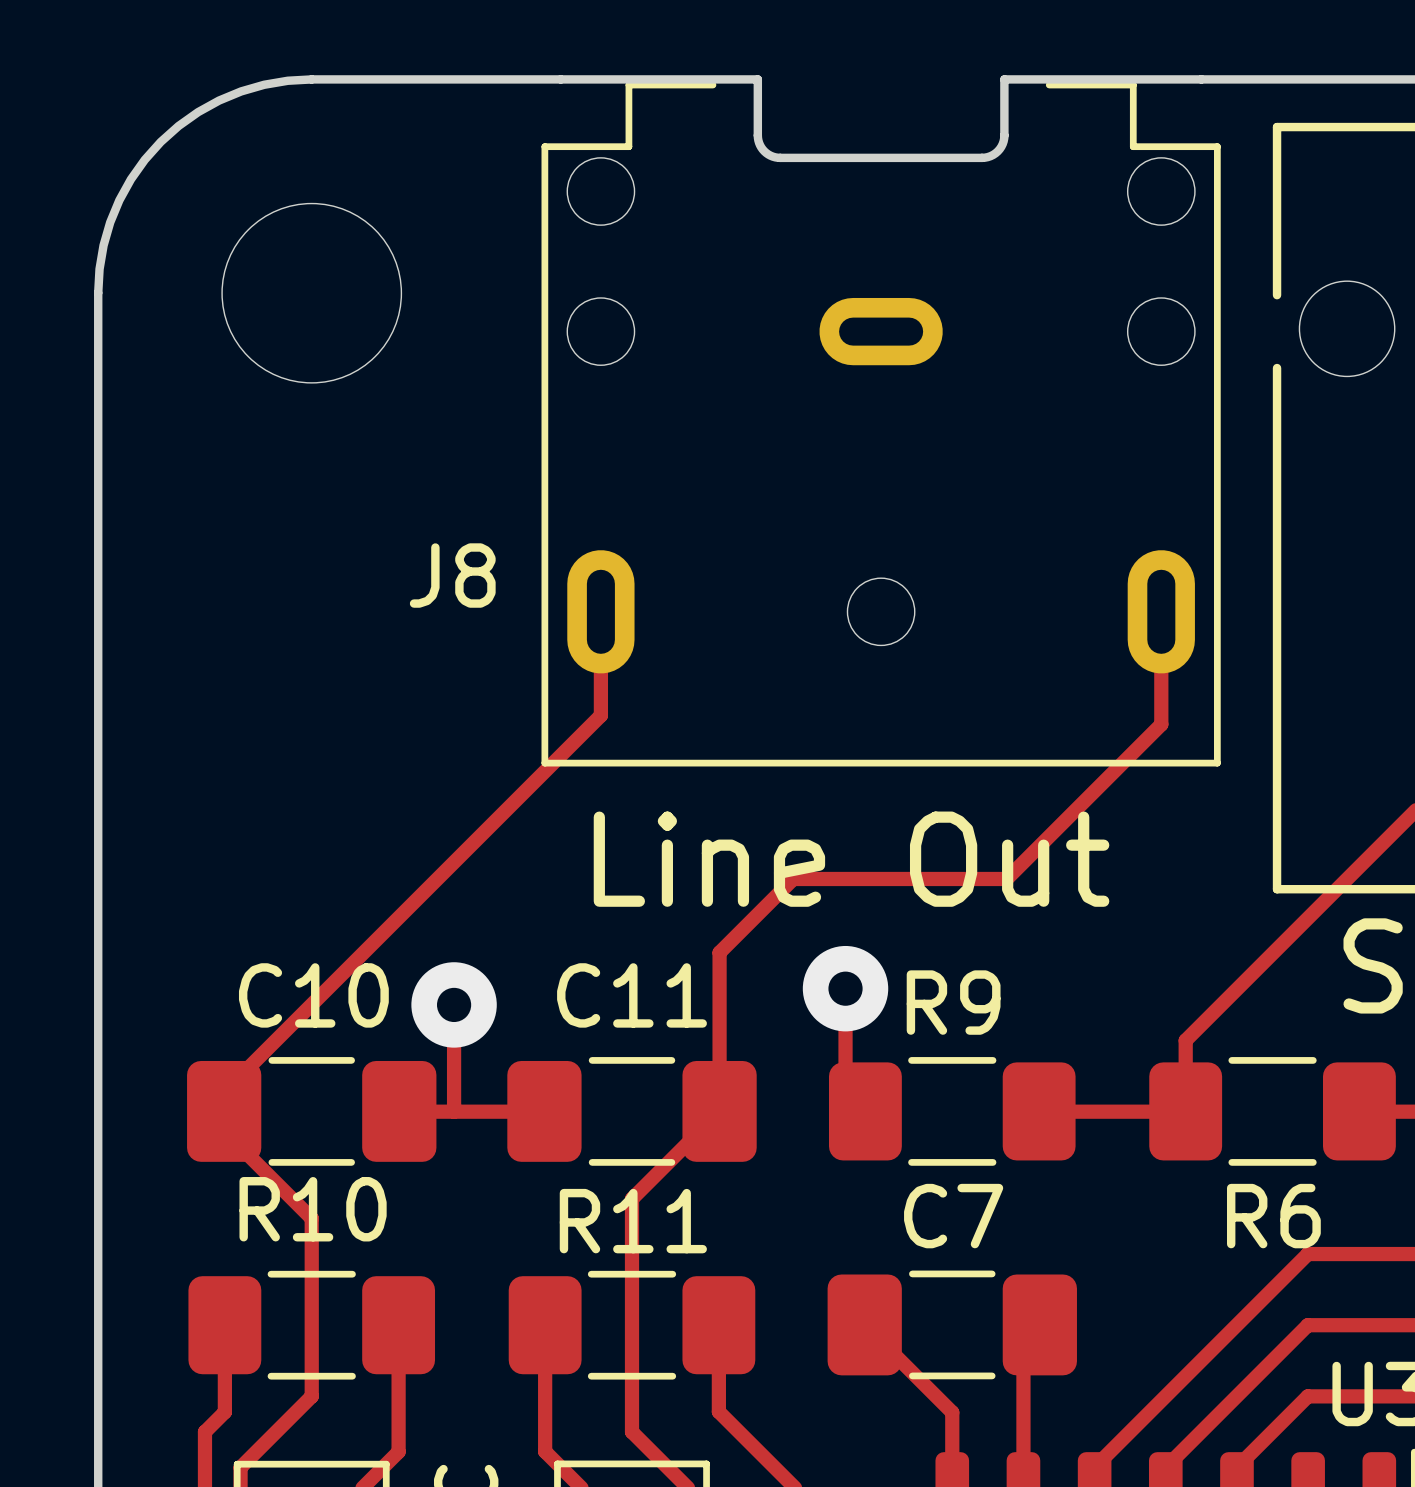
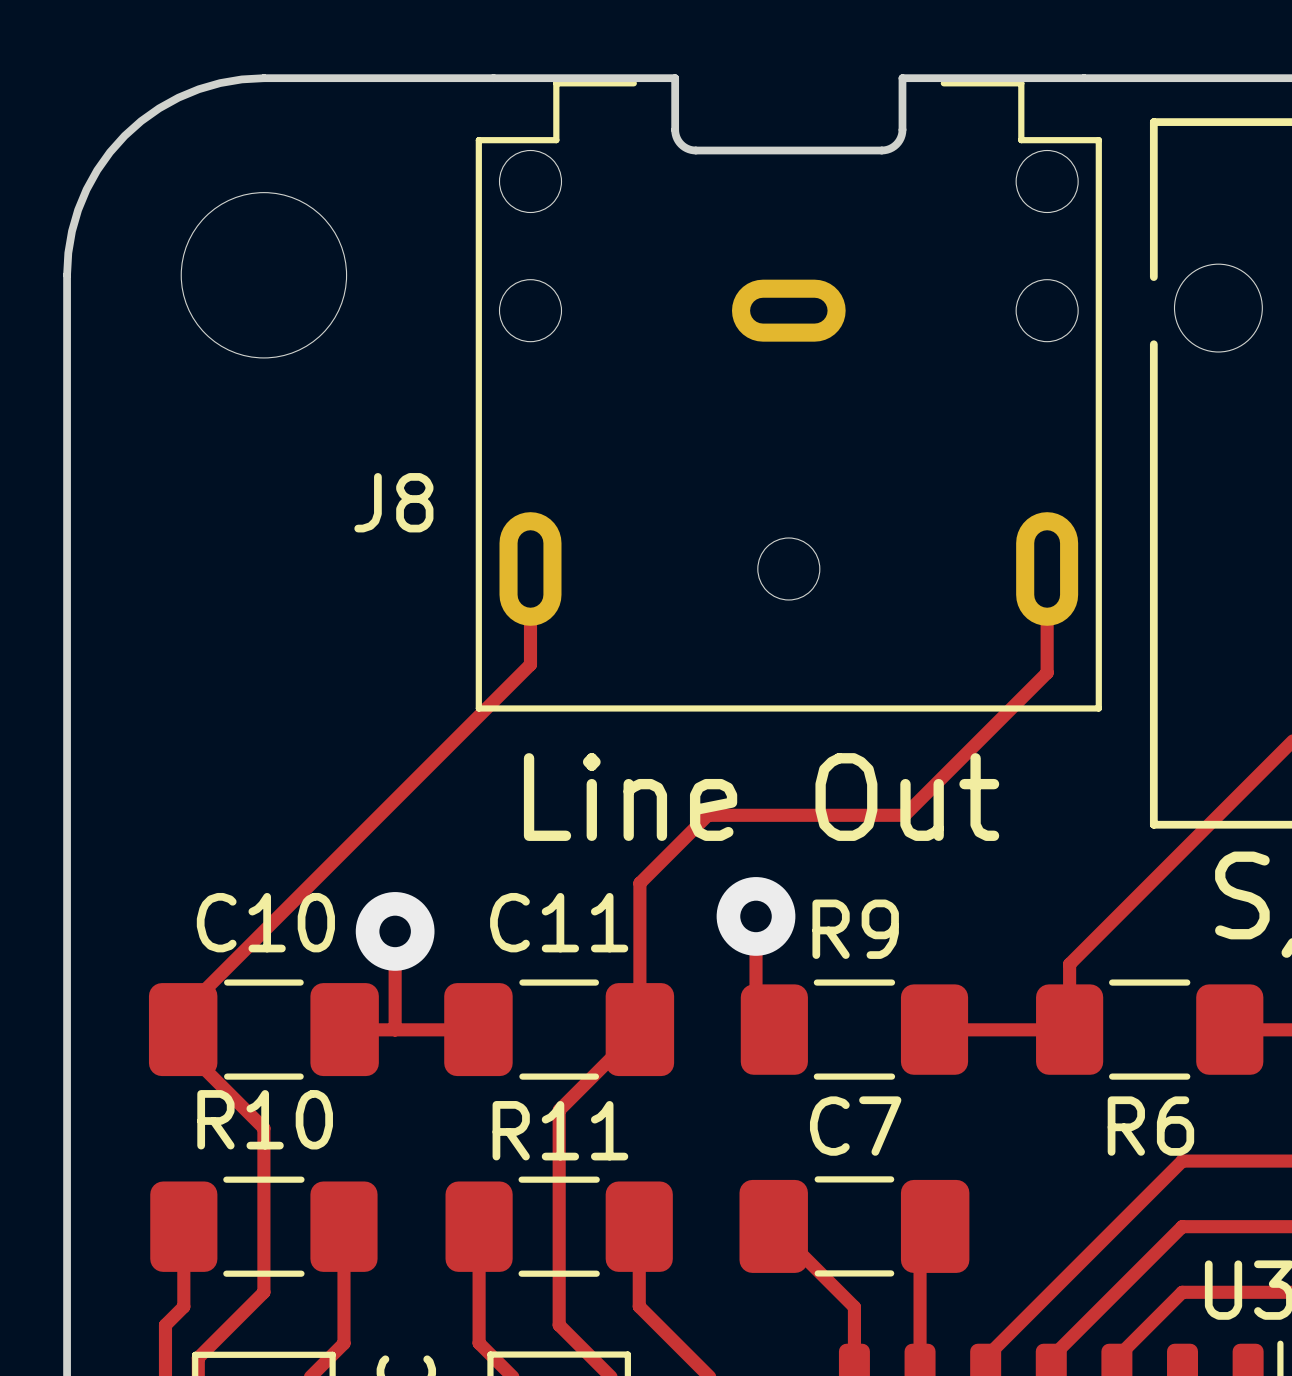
J8 name position: J8 (452, 575) -> J8 (393, 502)

